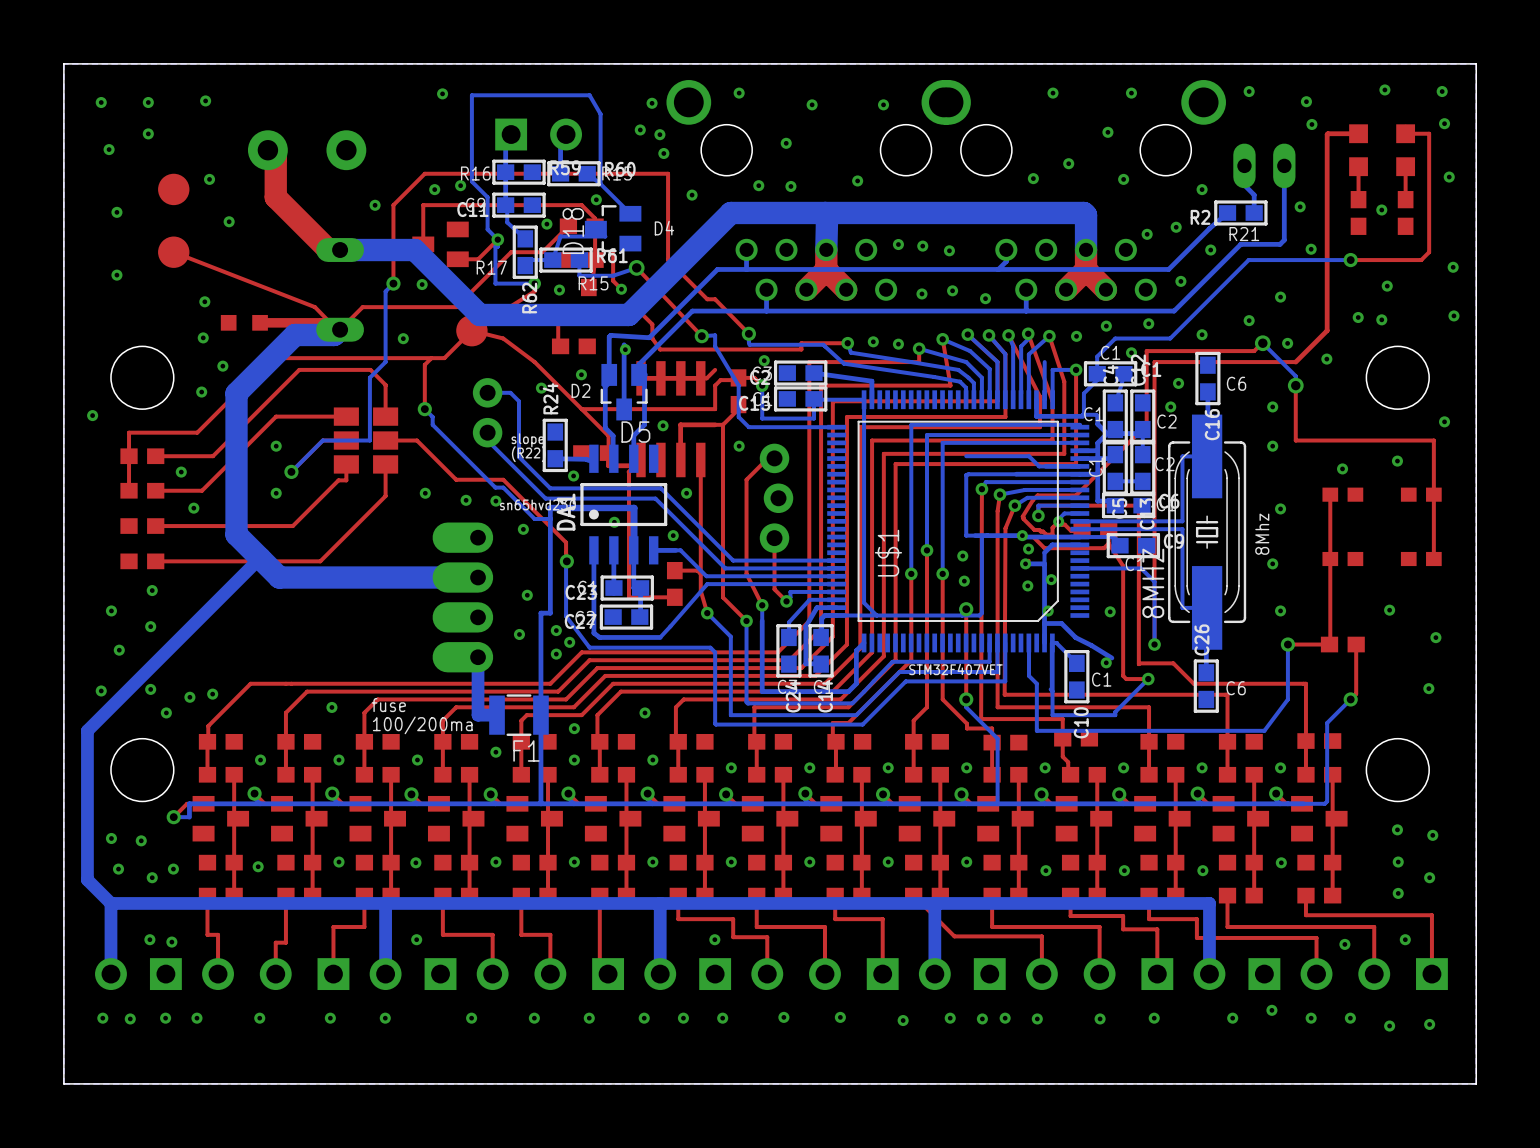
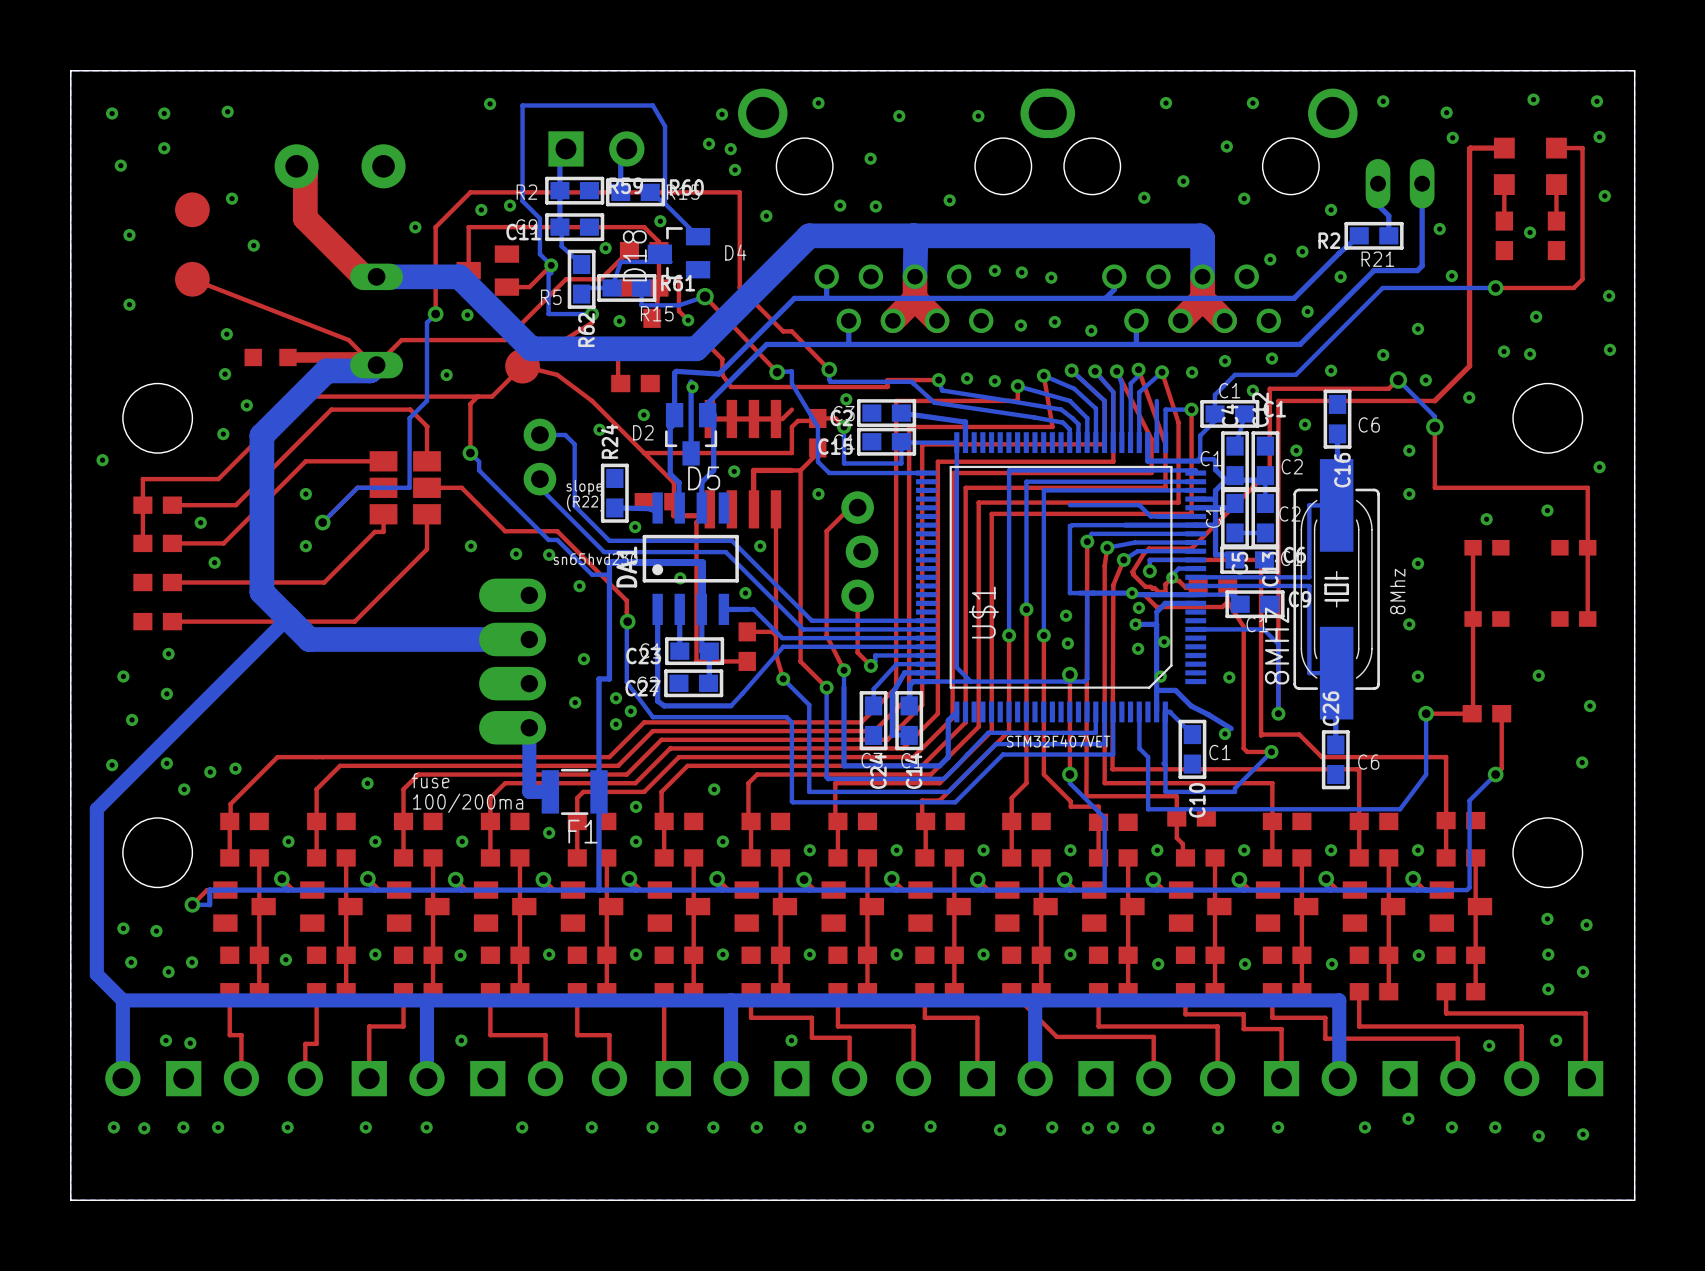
text: R16 (475, 173) -> R2 (526, 192)
text: R17 (491, 267) -> R5 (551, 297)

